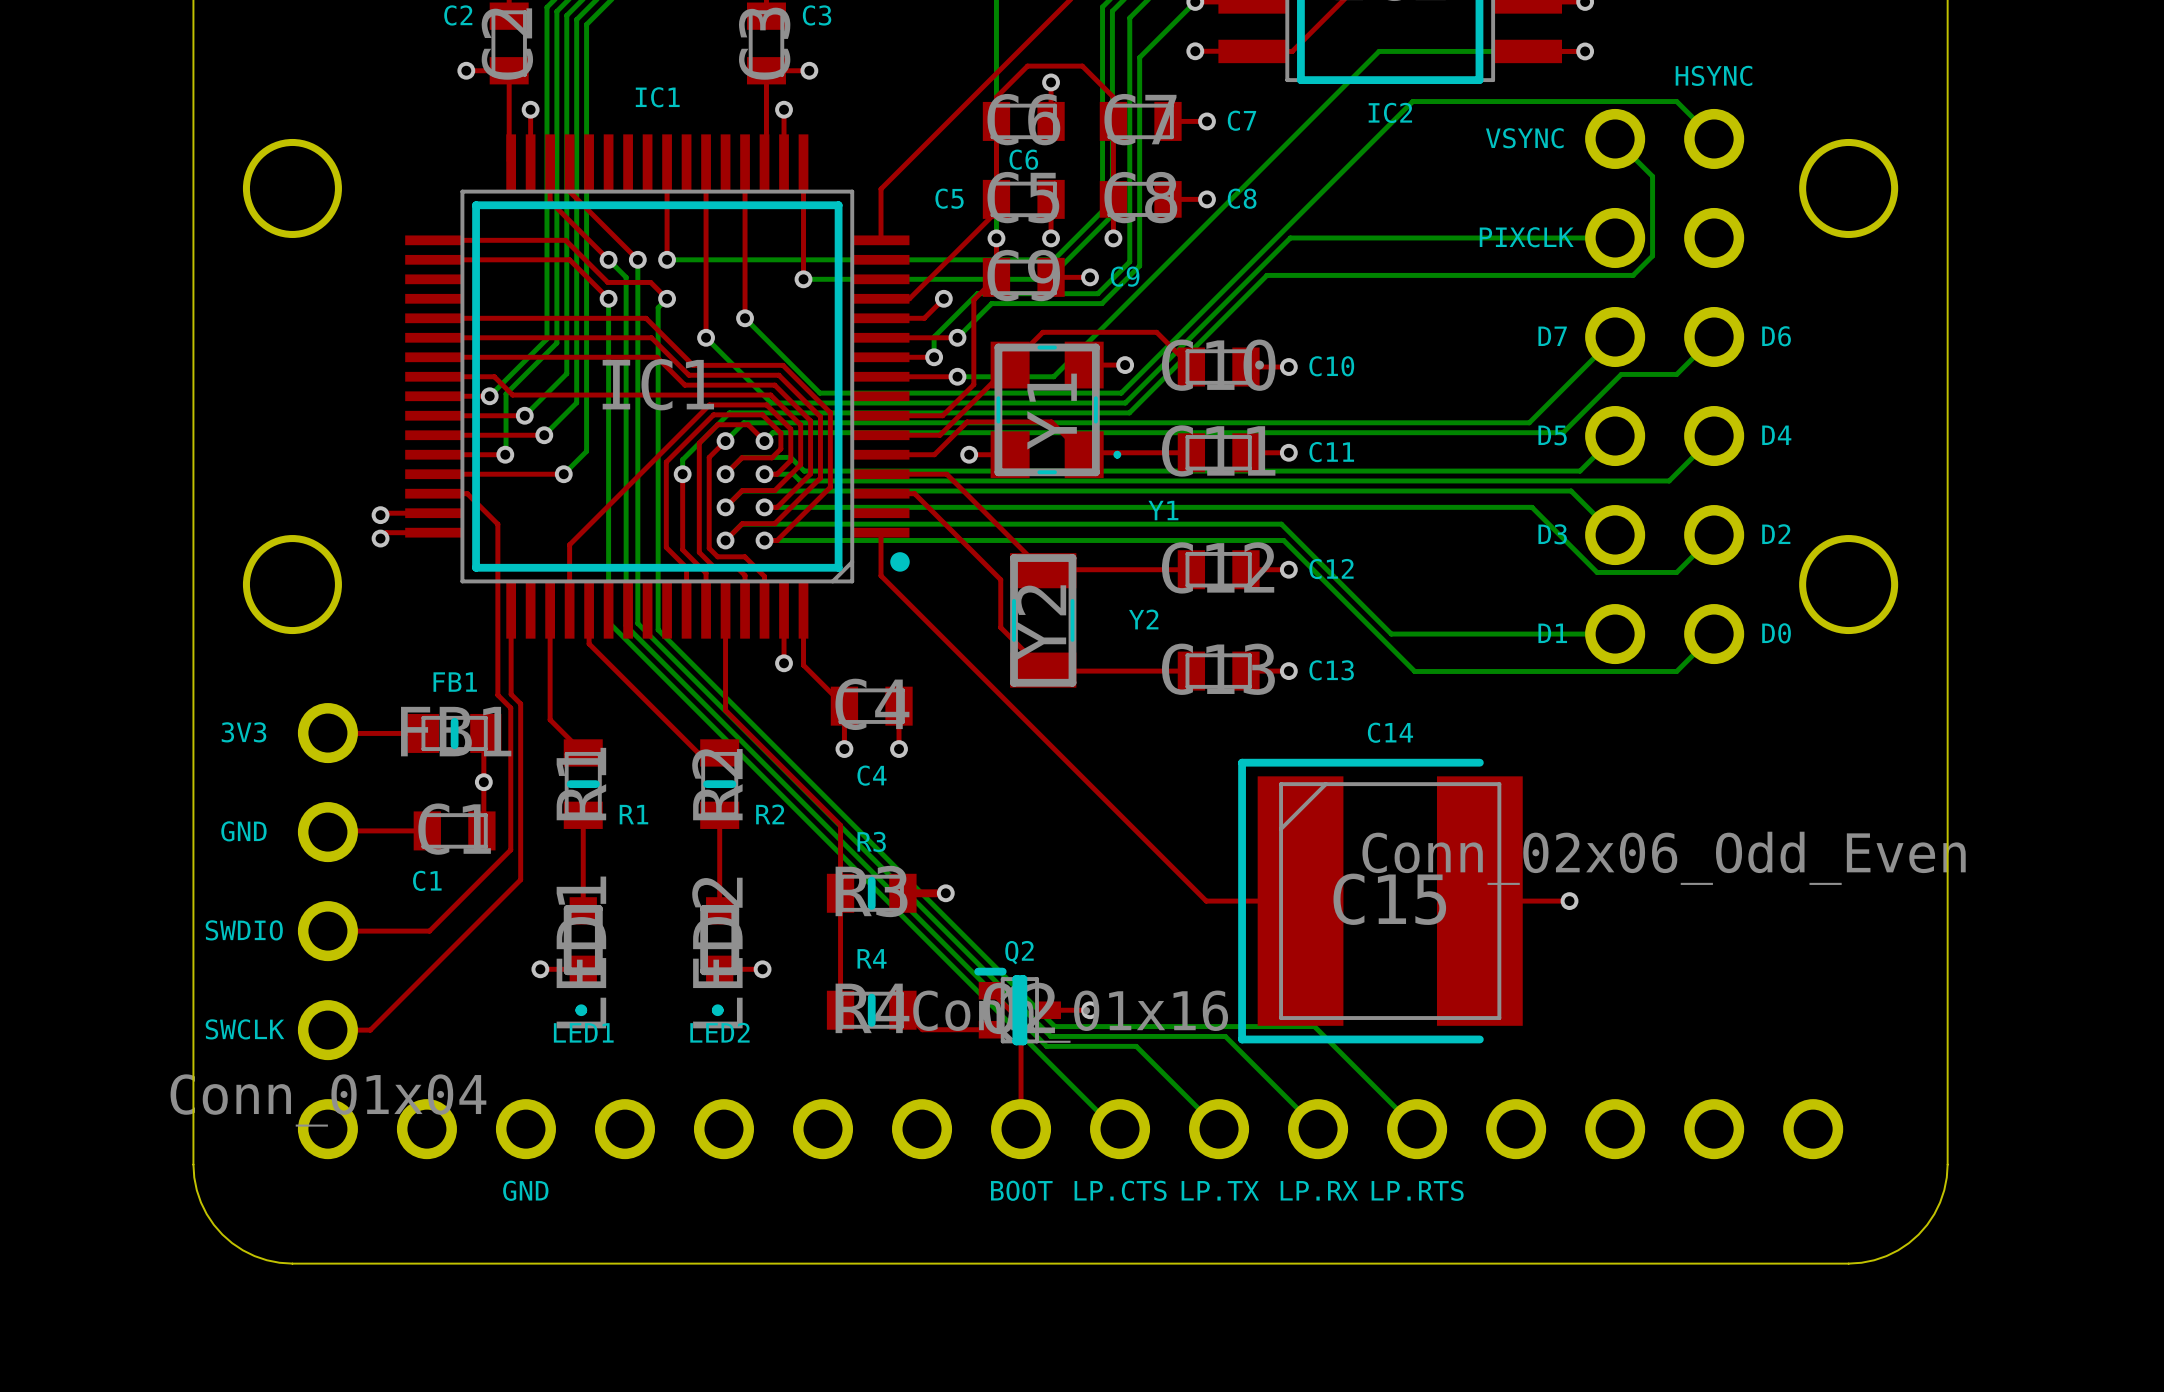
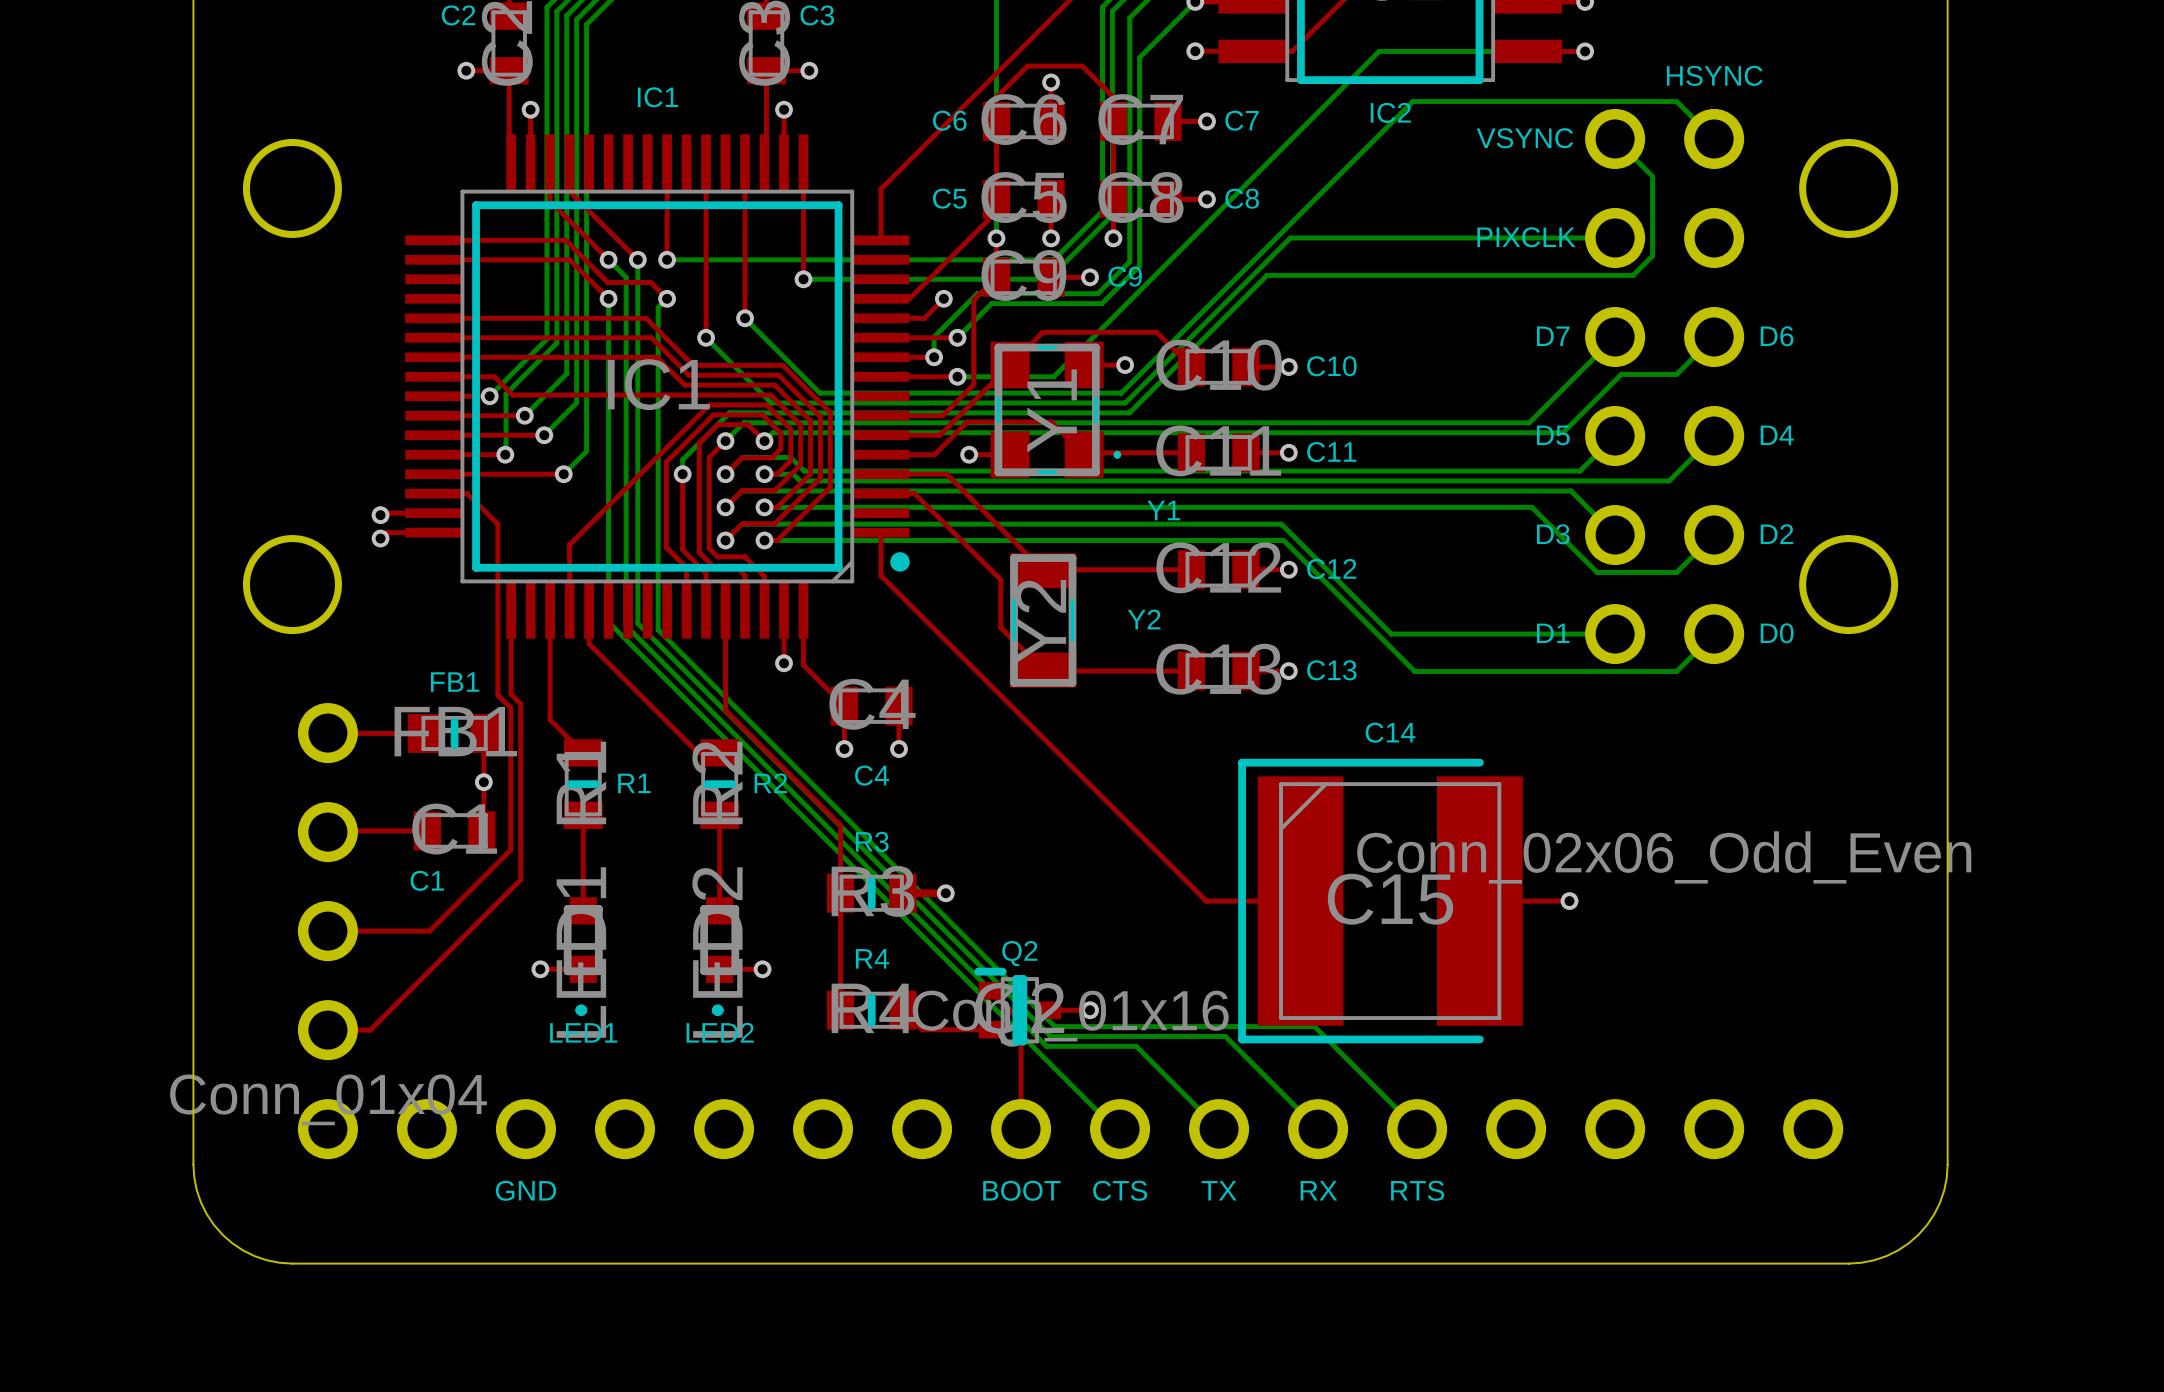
text position: C6 (1023, 159) -> C6 (949, 120)
text: 3V3 (244, 732) -> none
text position: R1 (633, 814) -> R1 (634, 783)
text position: R2 (770, 814) -> R2 (770, 783)
text: GND (243, 831) -> none
text: SWDIO (244, 930) -> none
text: SWCLK (244, 1029) -> none
text: LP.CTS (1120, 1190) -> CTS (1120, 1190)
text: LP.TX (1220, 1190) -> TX (1219, 1190)
text: LP.RX (1319, 1190) -> RX (1318, 1190)
text: LP.RTS (1417, 1190) -> RTS (1417, 1190)

